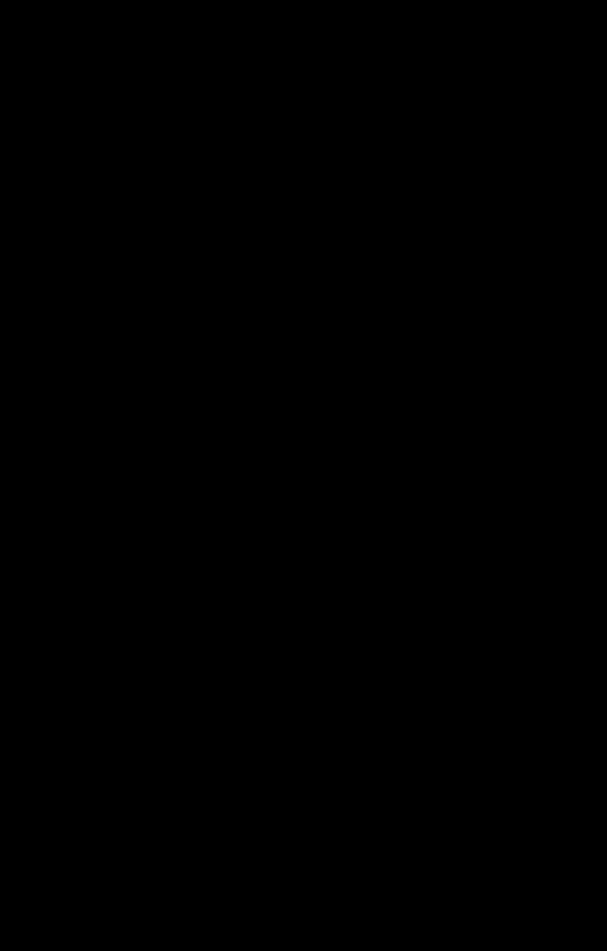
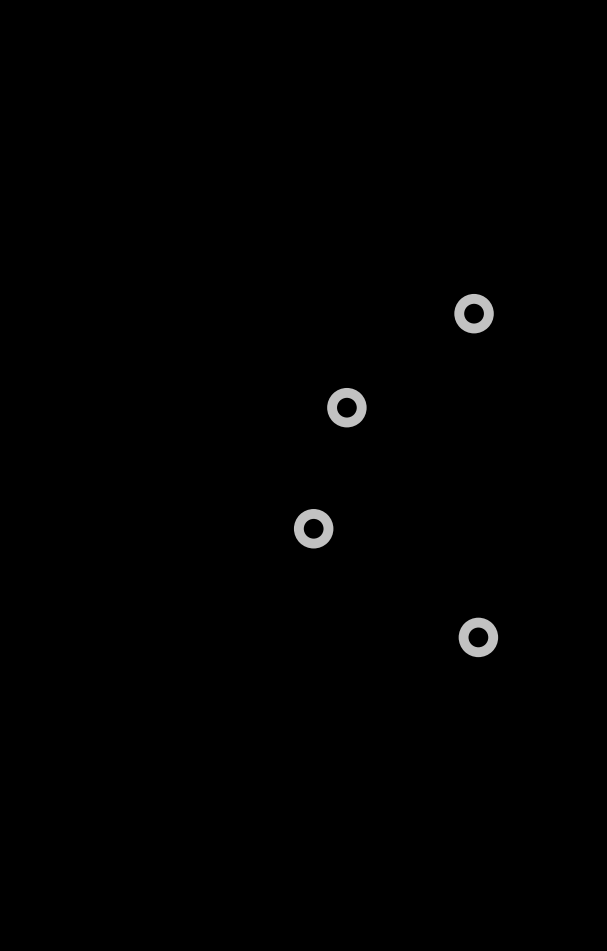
via: none -> (474, 313)
via: none -> (346, 407)
via: none -> (313, 528)
via: none -> (478, 637)

